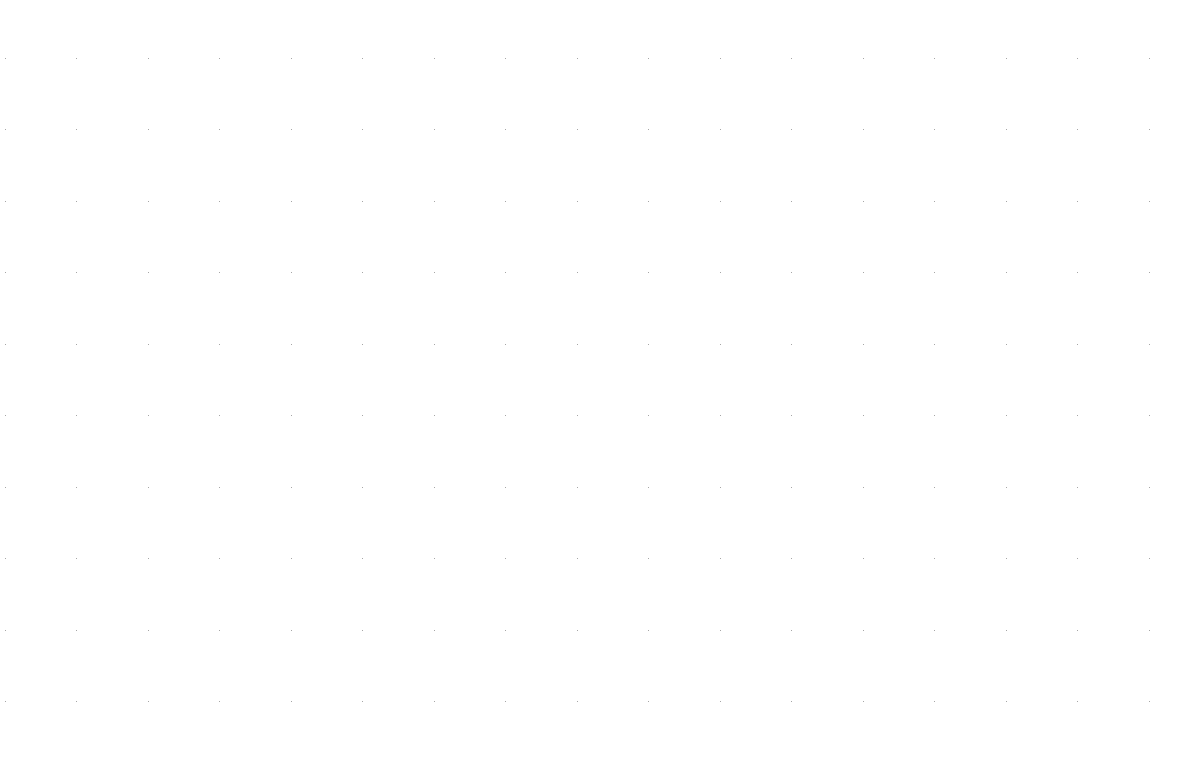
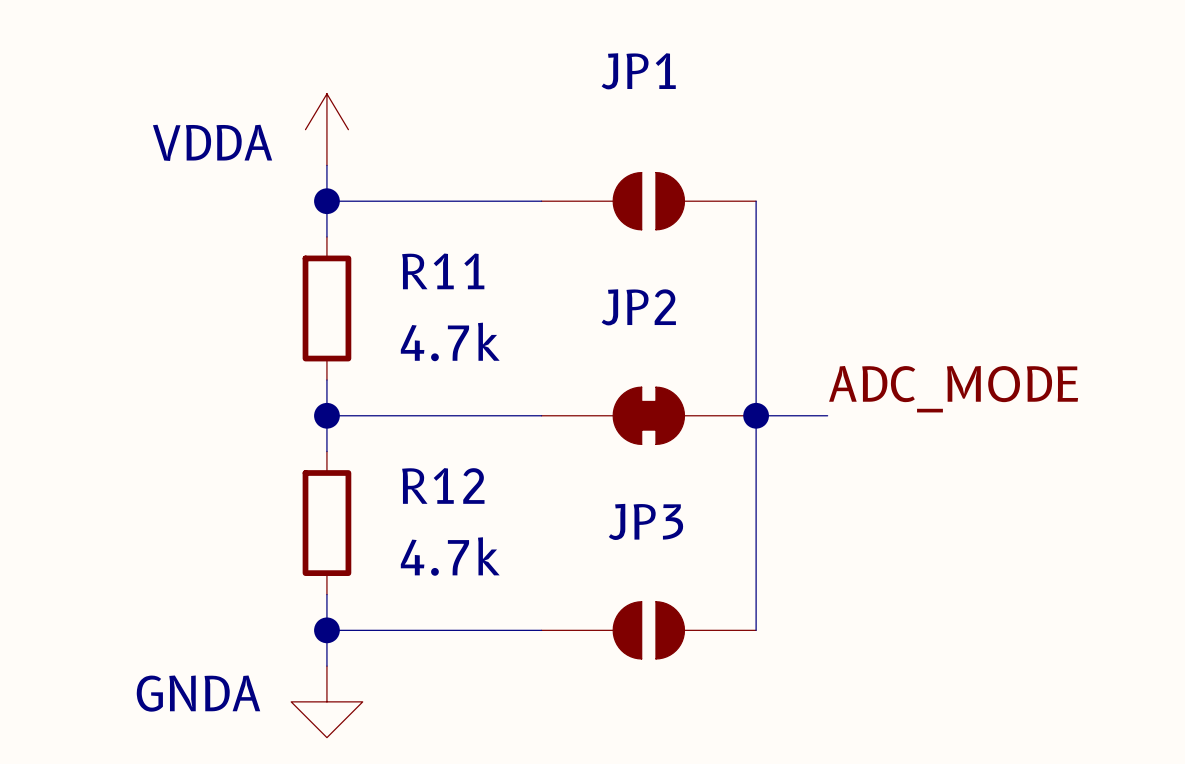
power symbol: none -> VDDA (326, 129)
wire: none -> (326, 165) (326, 236)
wire: none -> (326, 201) (541, 201)
junction: none -> (326, 201)
JP1: none -> (648, 201)
wire: none -> (756, 201) (756, 630)
R11: none -> 4.7k (326, 308)
wire: none -> (326, 380) (326, 451)
label: none -> ADC_MODE (953, 389)
wire: none -> (326, 415) (541, 415)
junction: none -> (326, 415)
JP2: none -> (648, 415)
wire: none -> (756, 415) (827, 415)
junction: none -> (756, 415)
R12: none -> 4.7k (326, 523)
wire: none -> (326, 594) (326, 666)
wire: none -> (326, 630) (541, 630)
junction: none -> (326, 630)
JP3: none -> (648, 630)
power symbol: none -> GNDA (326, 701)

